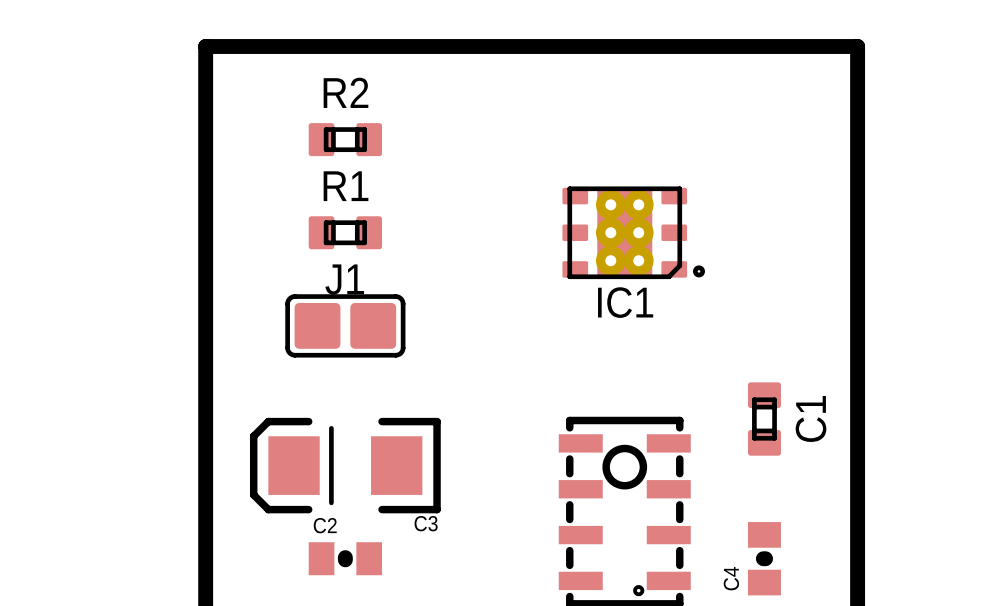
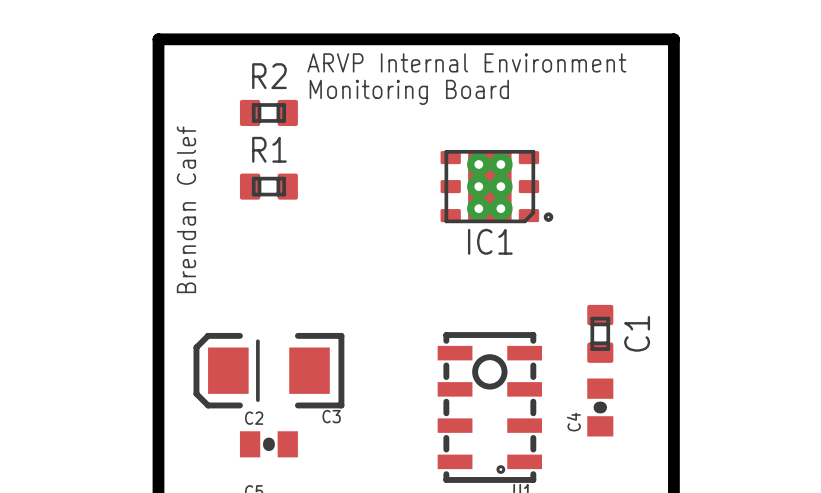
text: none -> ARVP Internal Environment (466, 62)
text: none -> Monitoring Board (409, 92)
text: none -> Brendan Calef (186, 209)
J1: (345, 325) -> none
C4 position: (764, 558) -> (600, 407)

